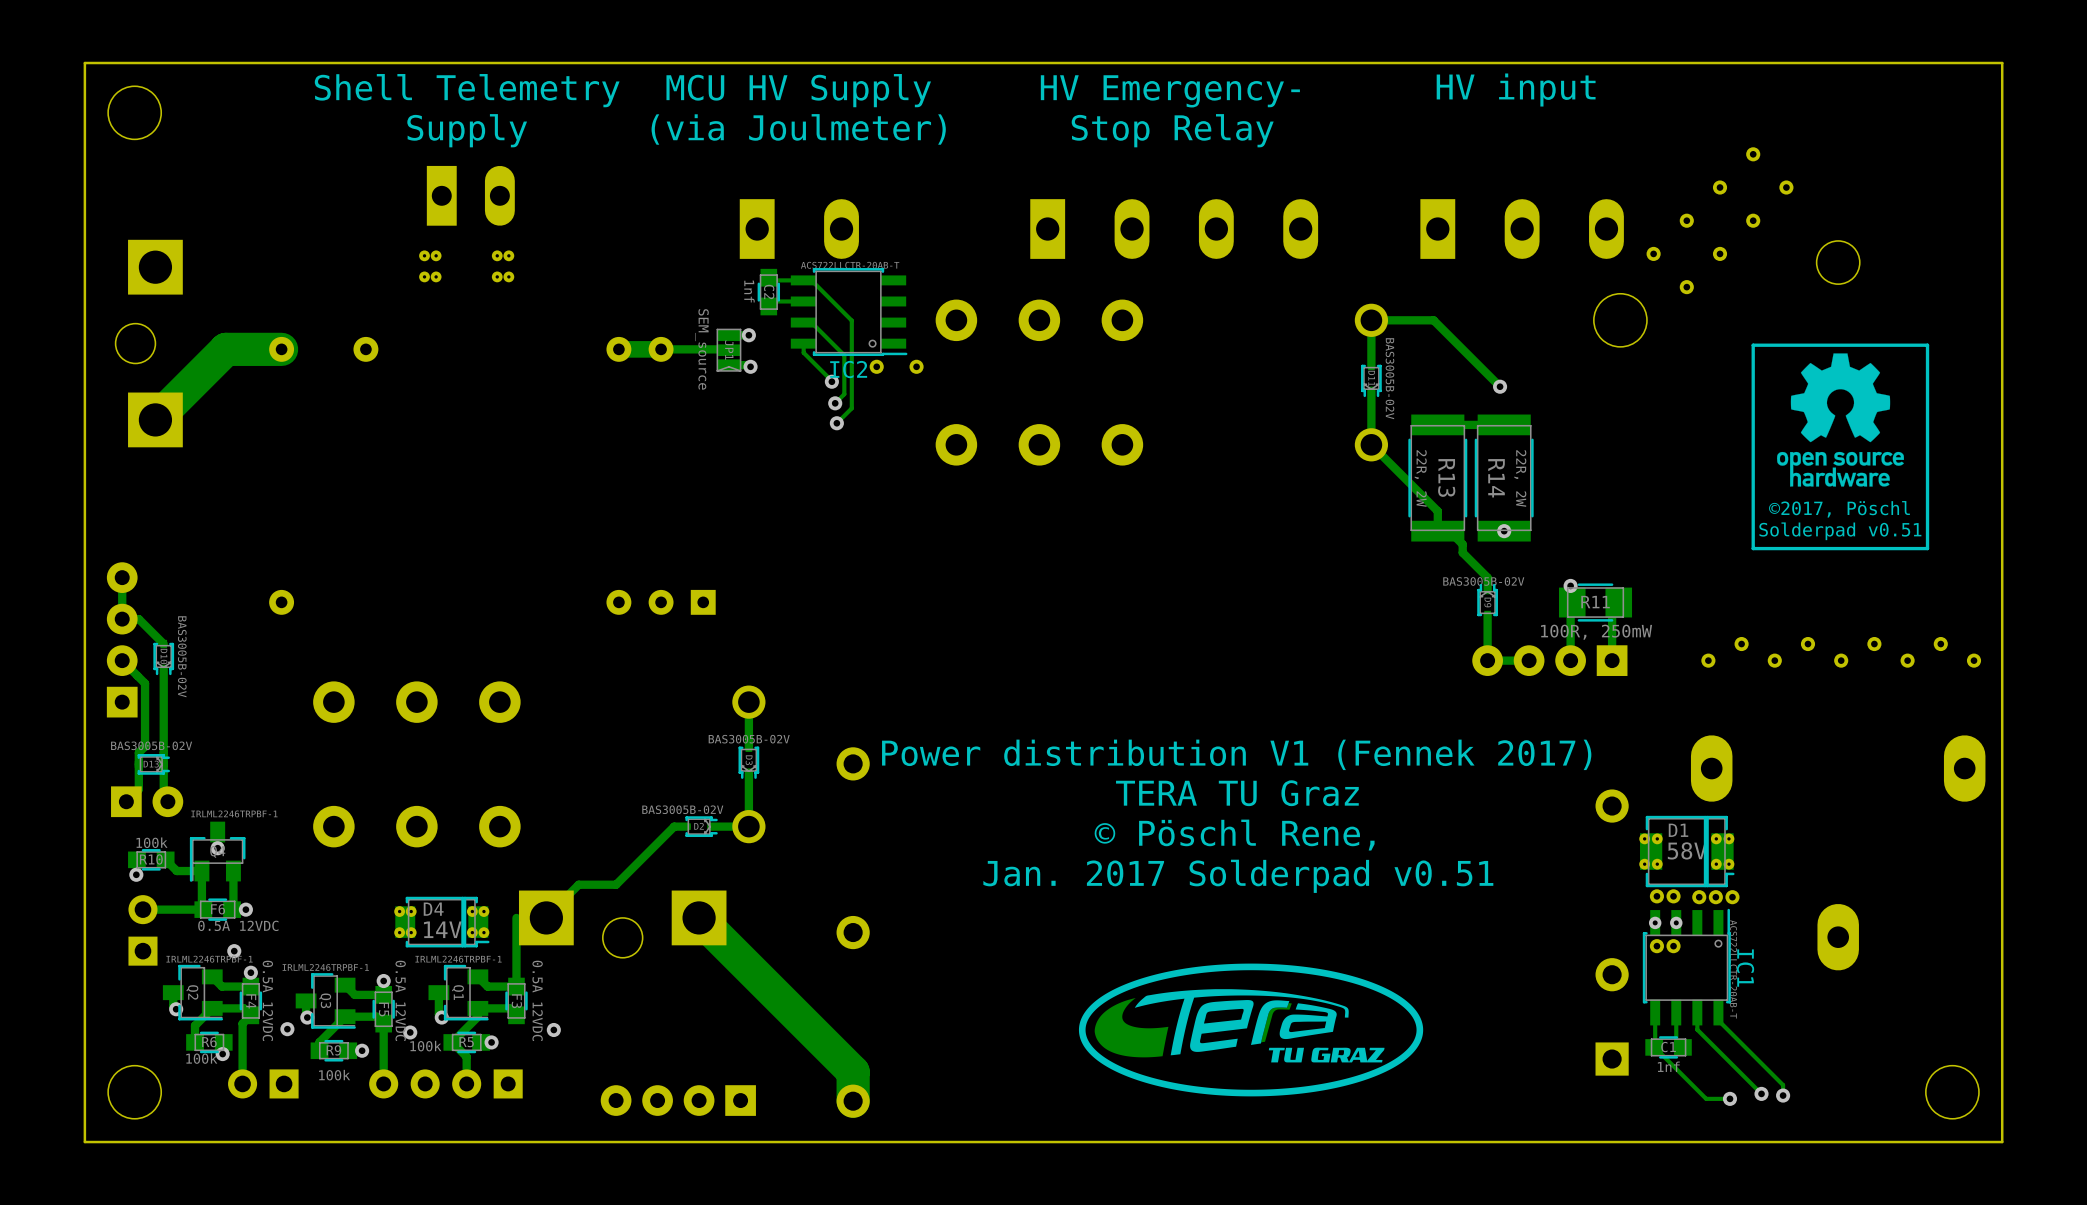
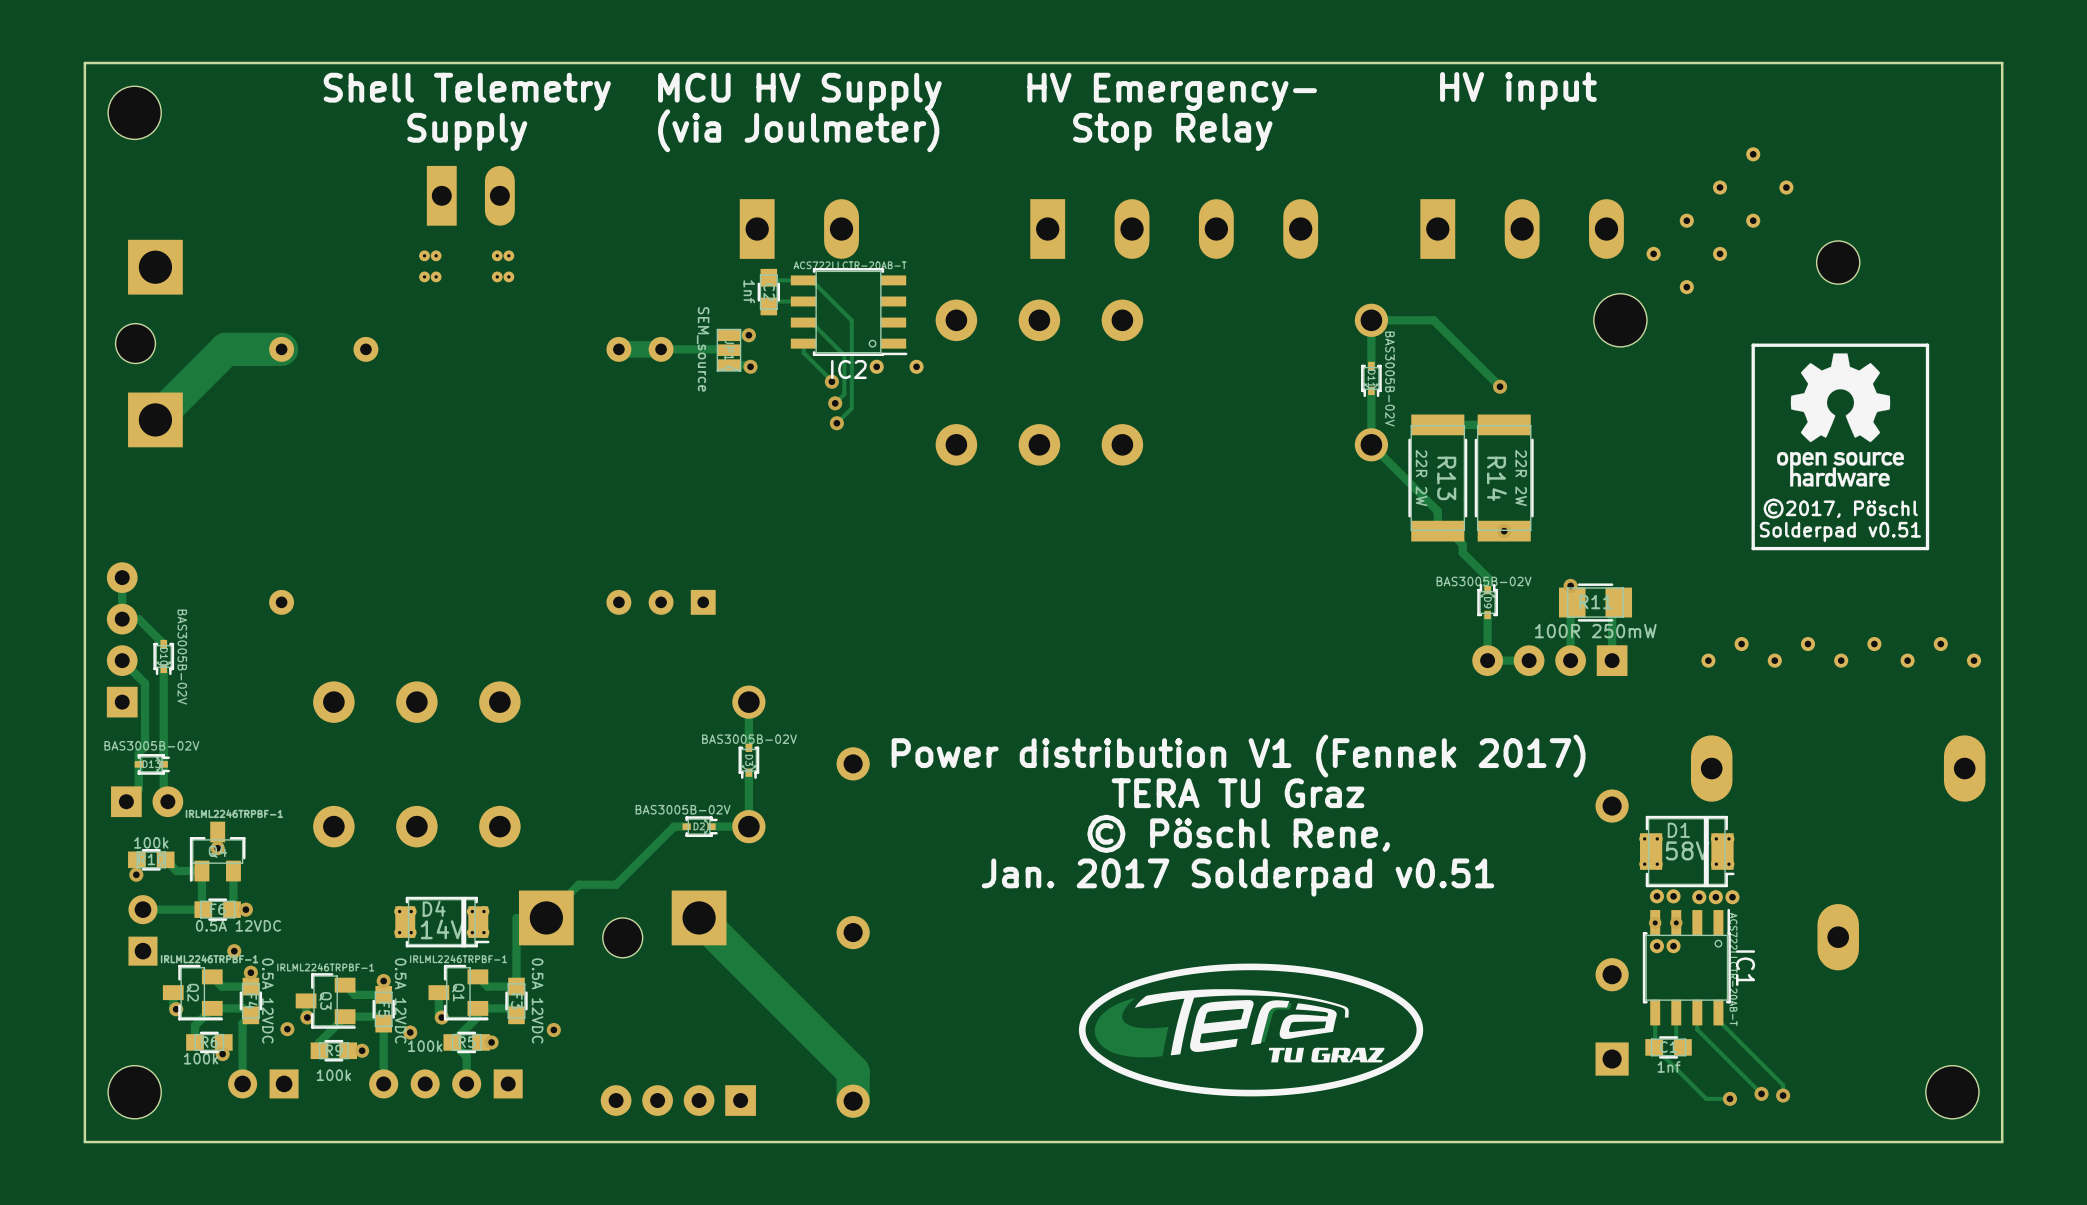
R13 value: 22R, 2W (1420, 478) -> 22R 2W (1421, 478)
R14 value: 22R, 2W (1520, 478) -> 22R 2W (1521, 478)
R11 value: 100R, 250mW (1596, 632) -> 100R 250mW (1595, 631)

